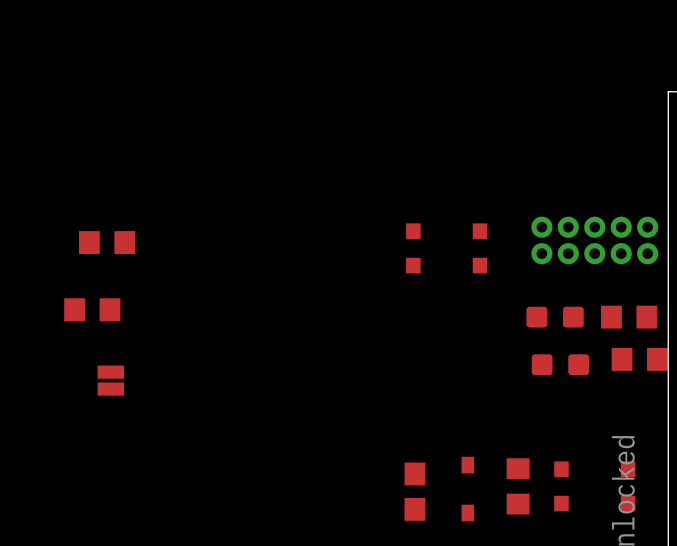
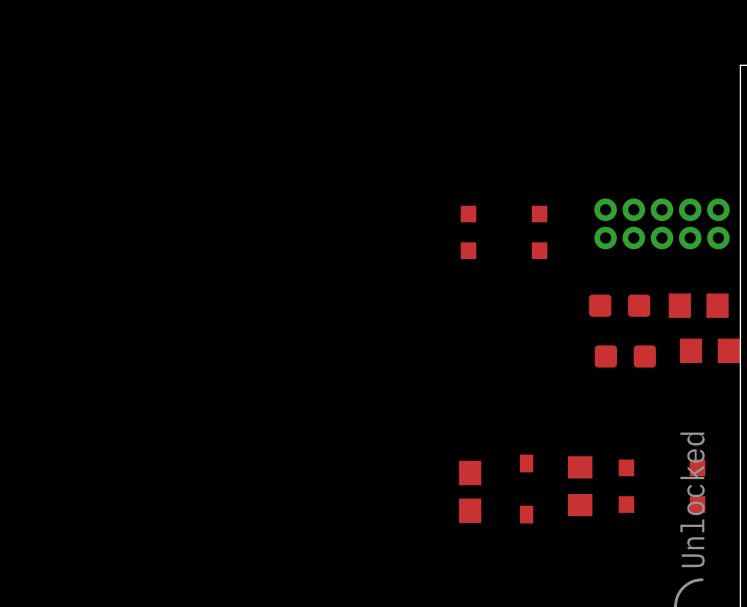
part: (107, 242) -> none
part: (92, 309) -> none
part: (110, 380) -> none

